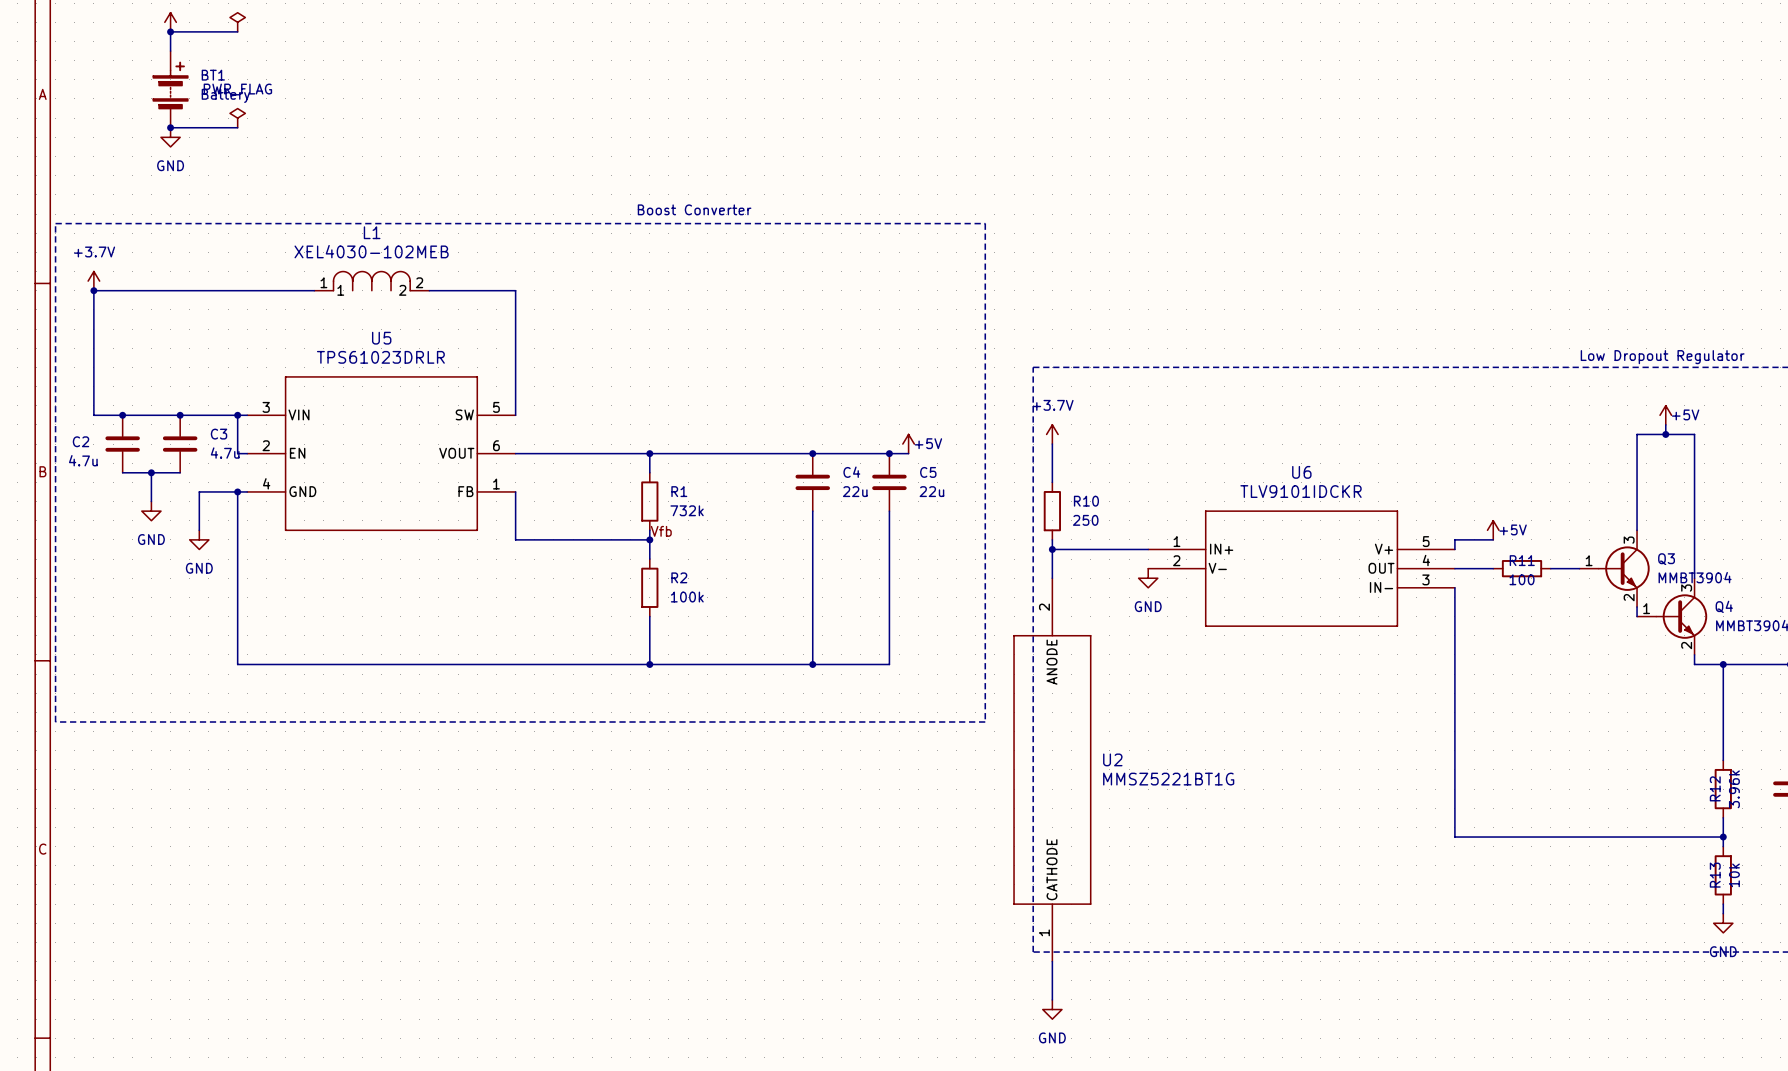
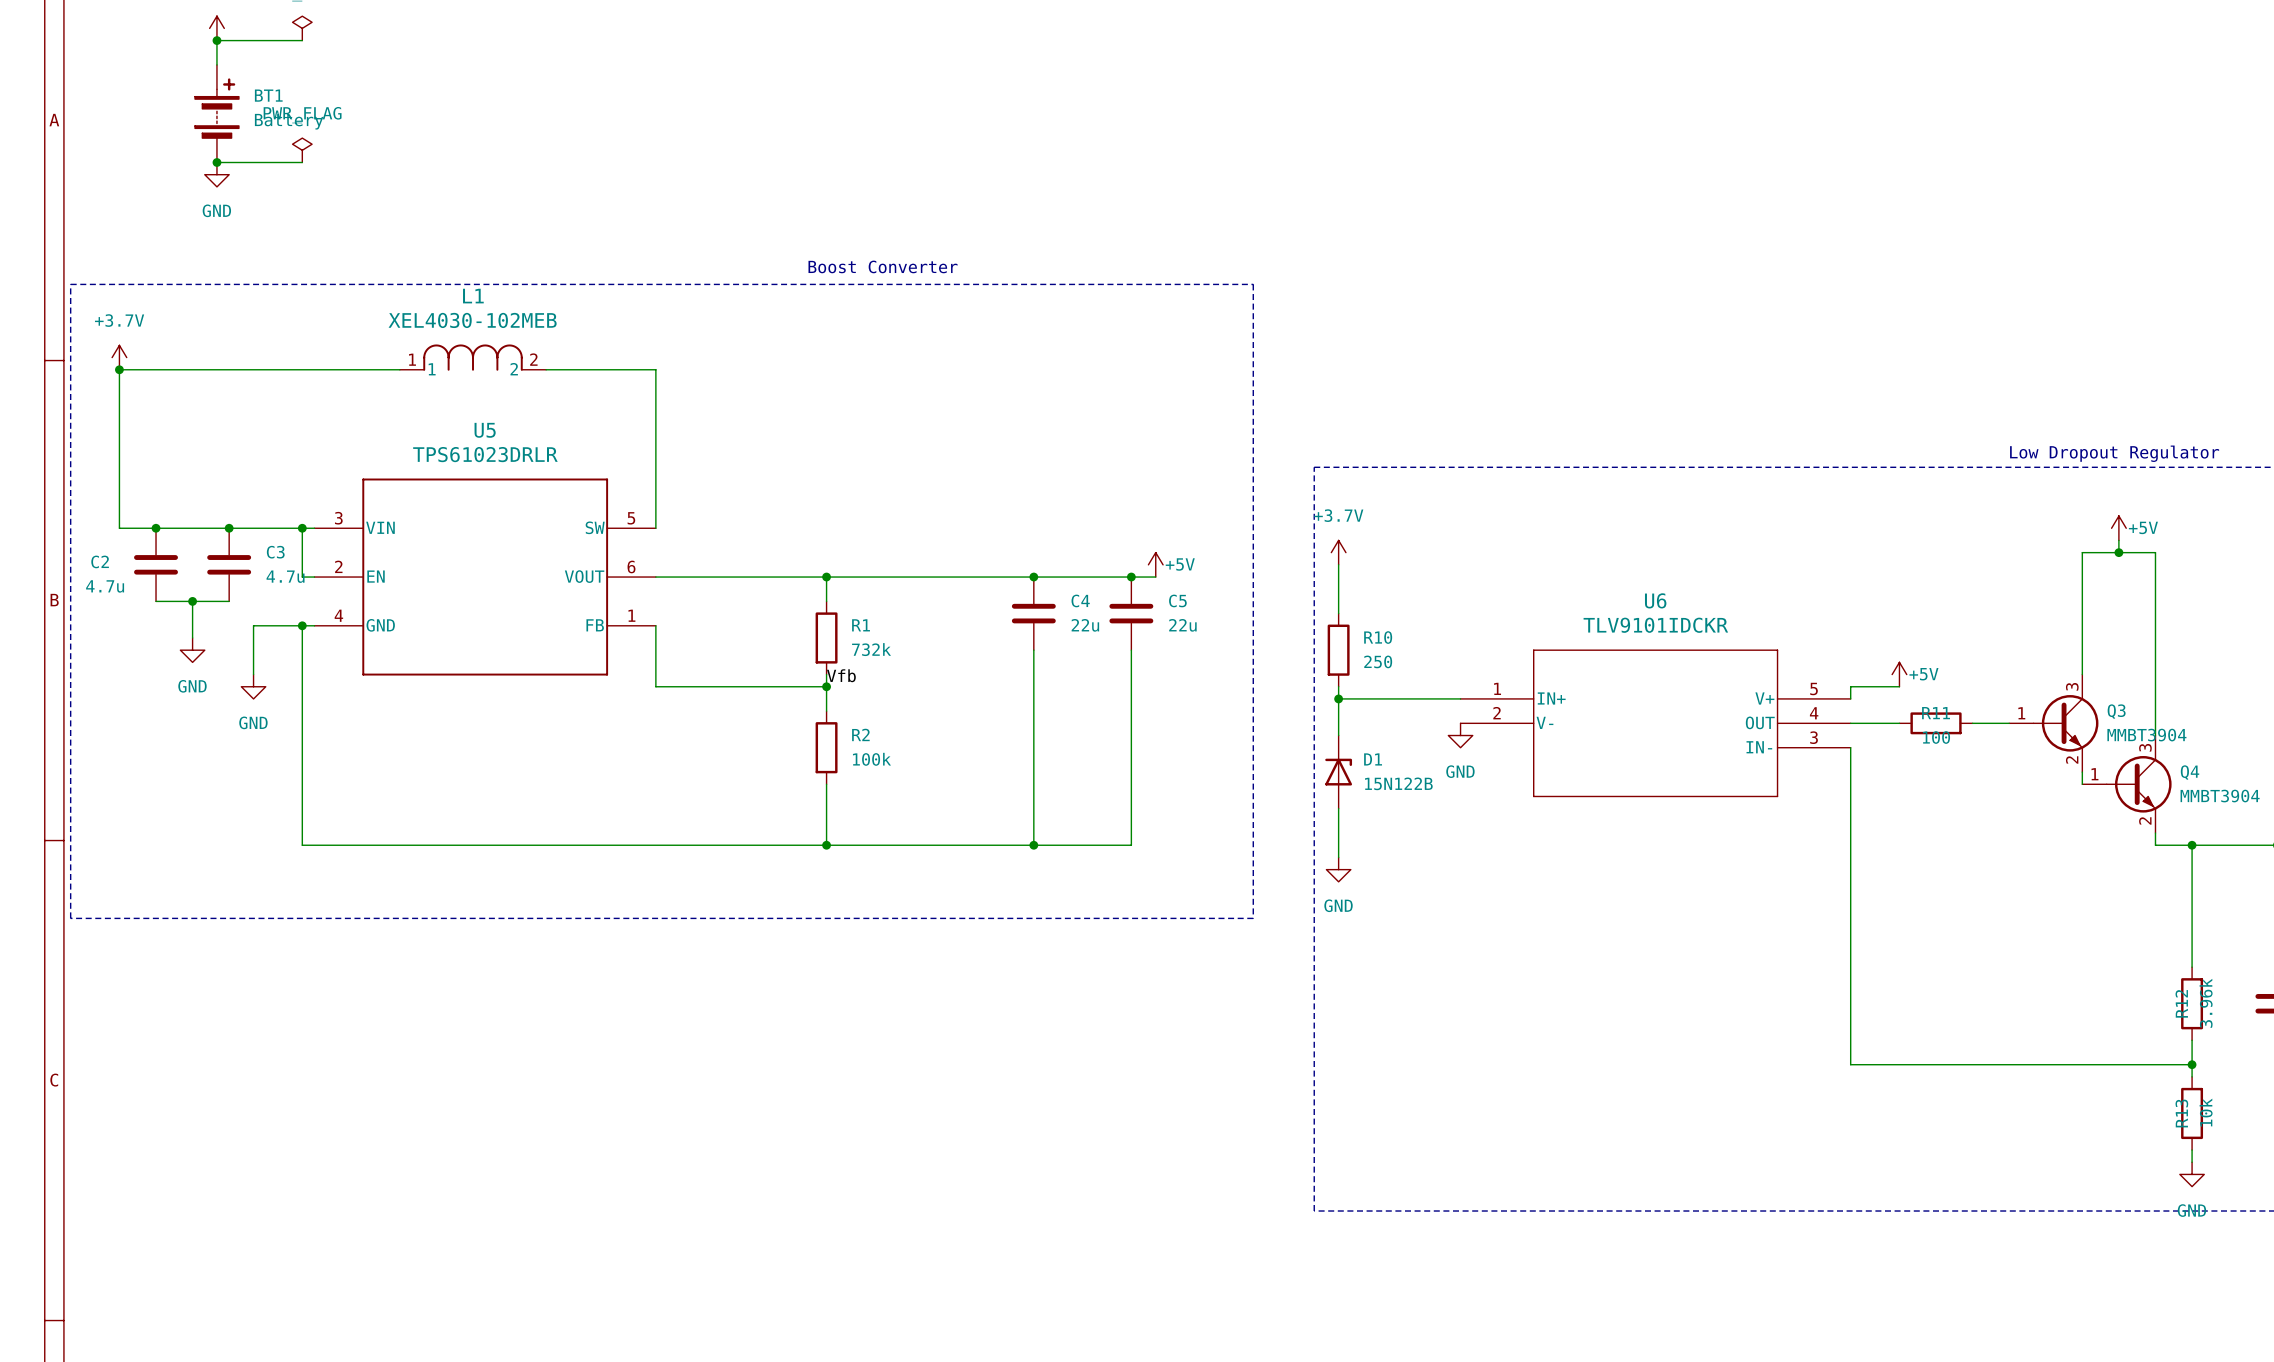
D1: none -> 15N122B (1338, 772)
wire: none -> (1338, 808) (1338, 857)
power symbol: none -> GND (1338, 869)
U2: MMSZ5221BT1G (1052, 769) -> none
wire: (1052, 961) (1052, 999) -> none
power symbol: GND (1052, 1009) -> none

